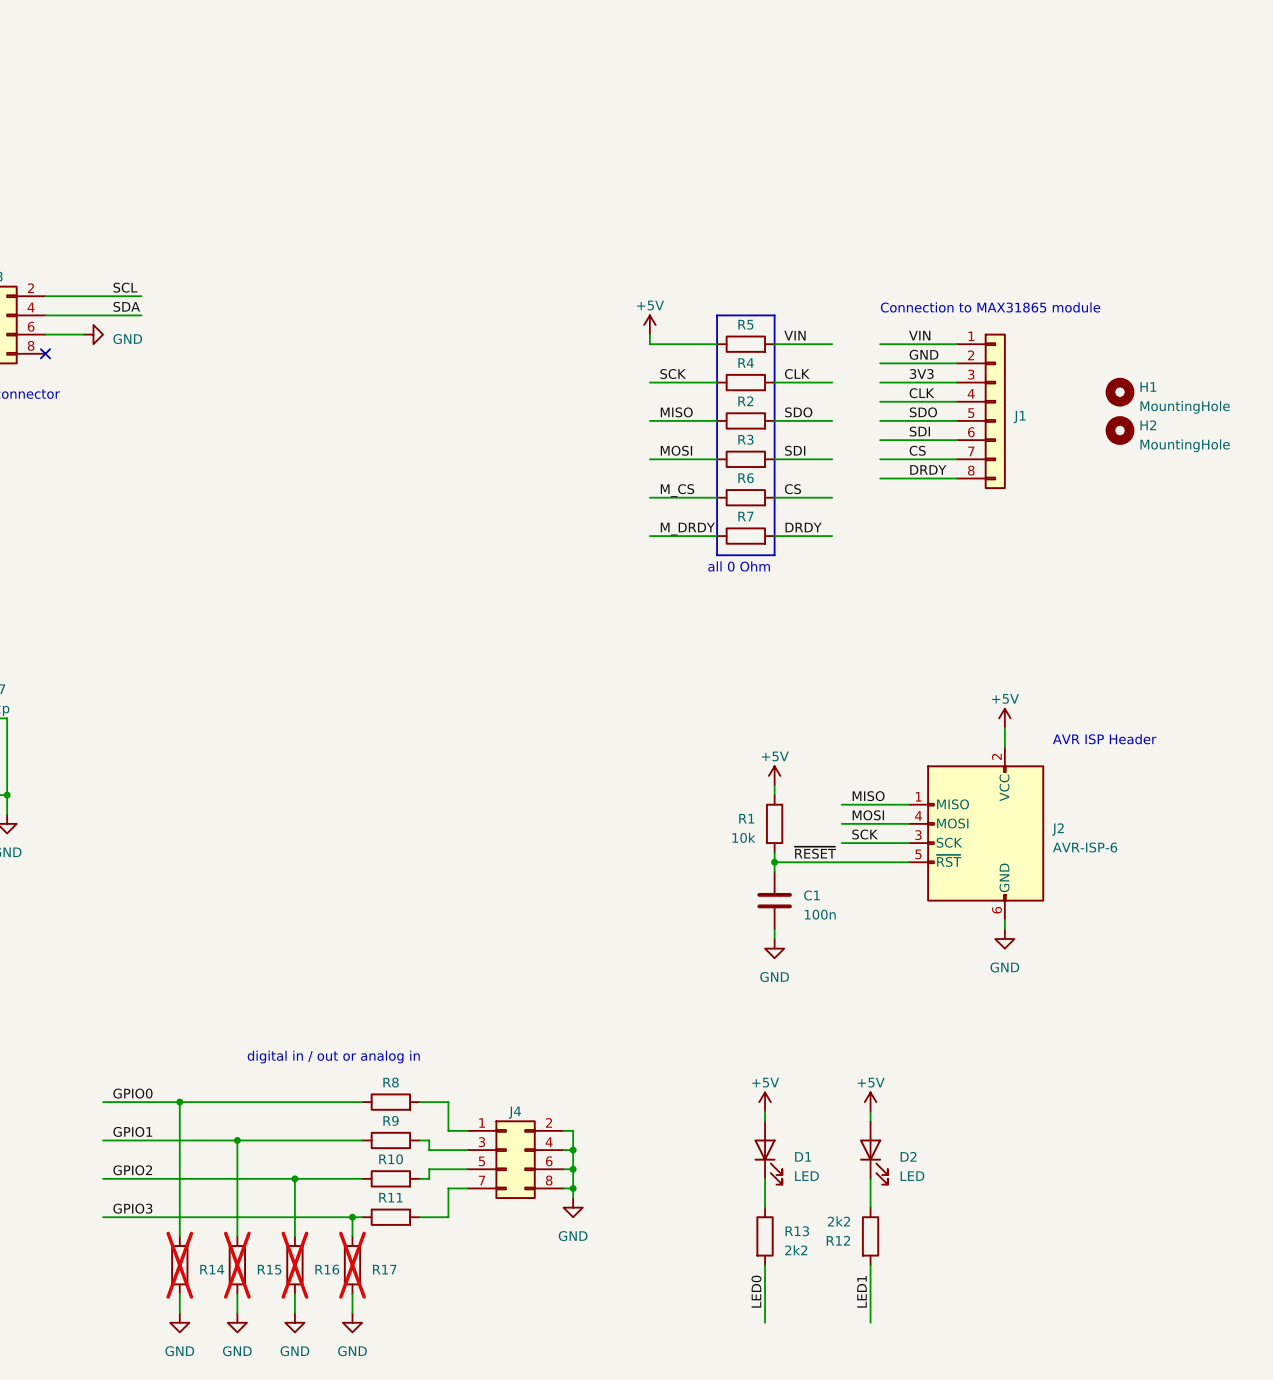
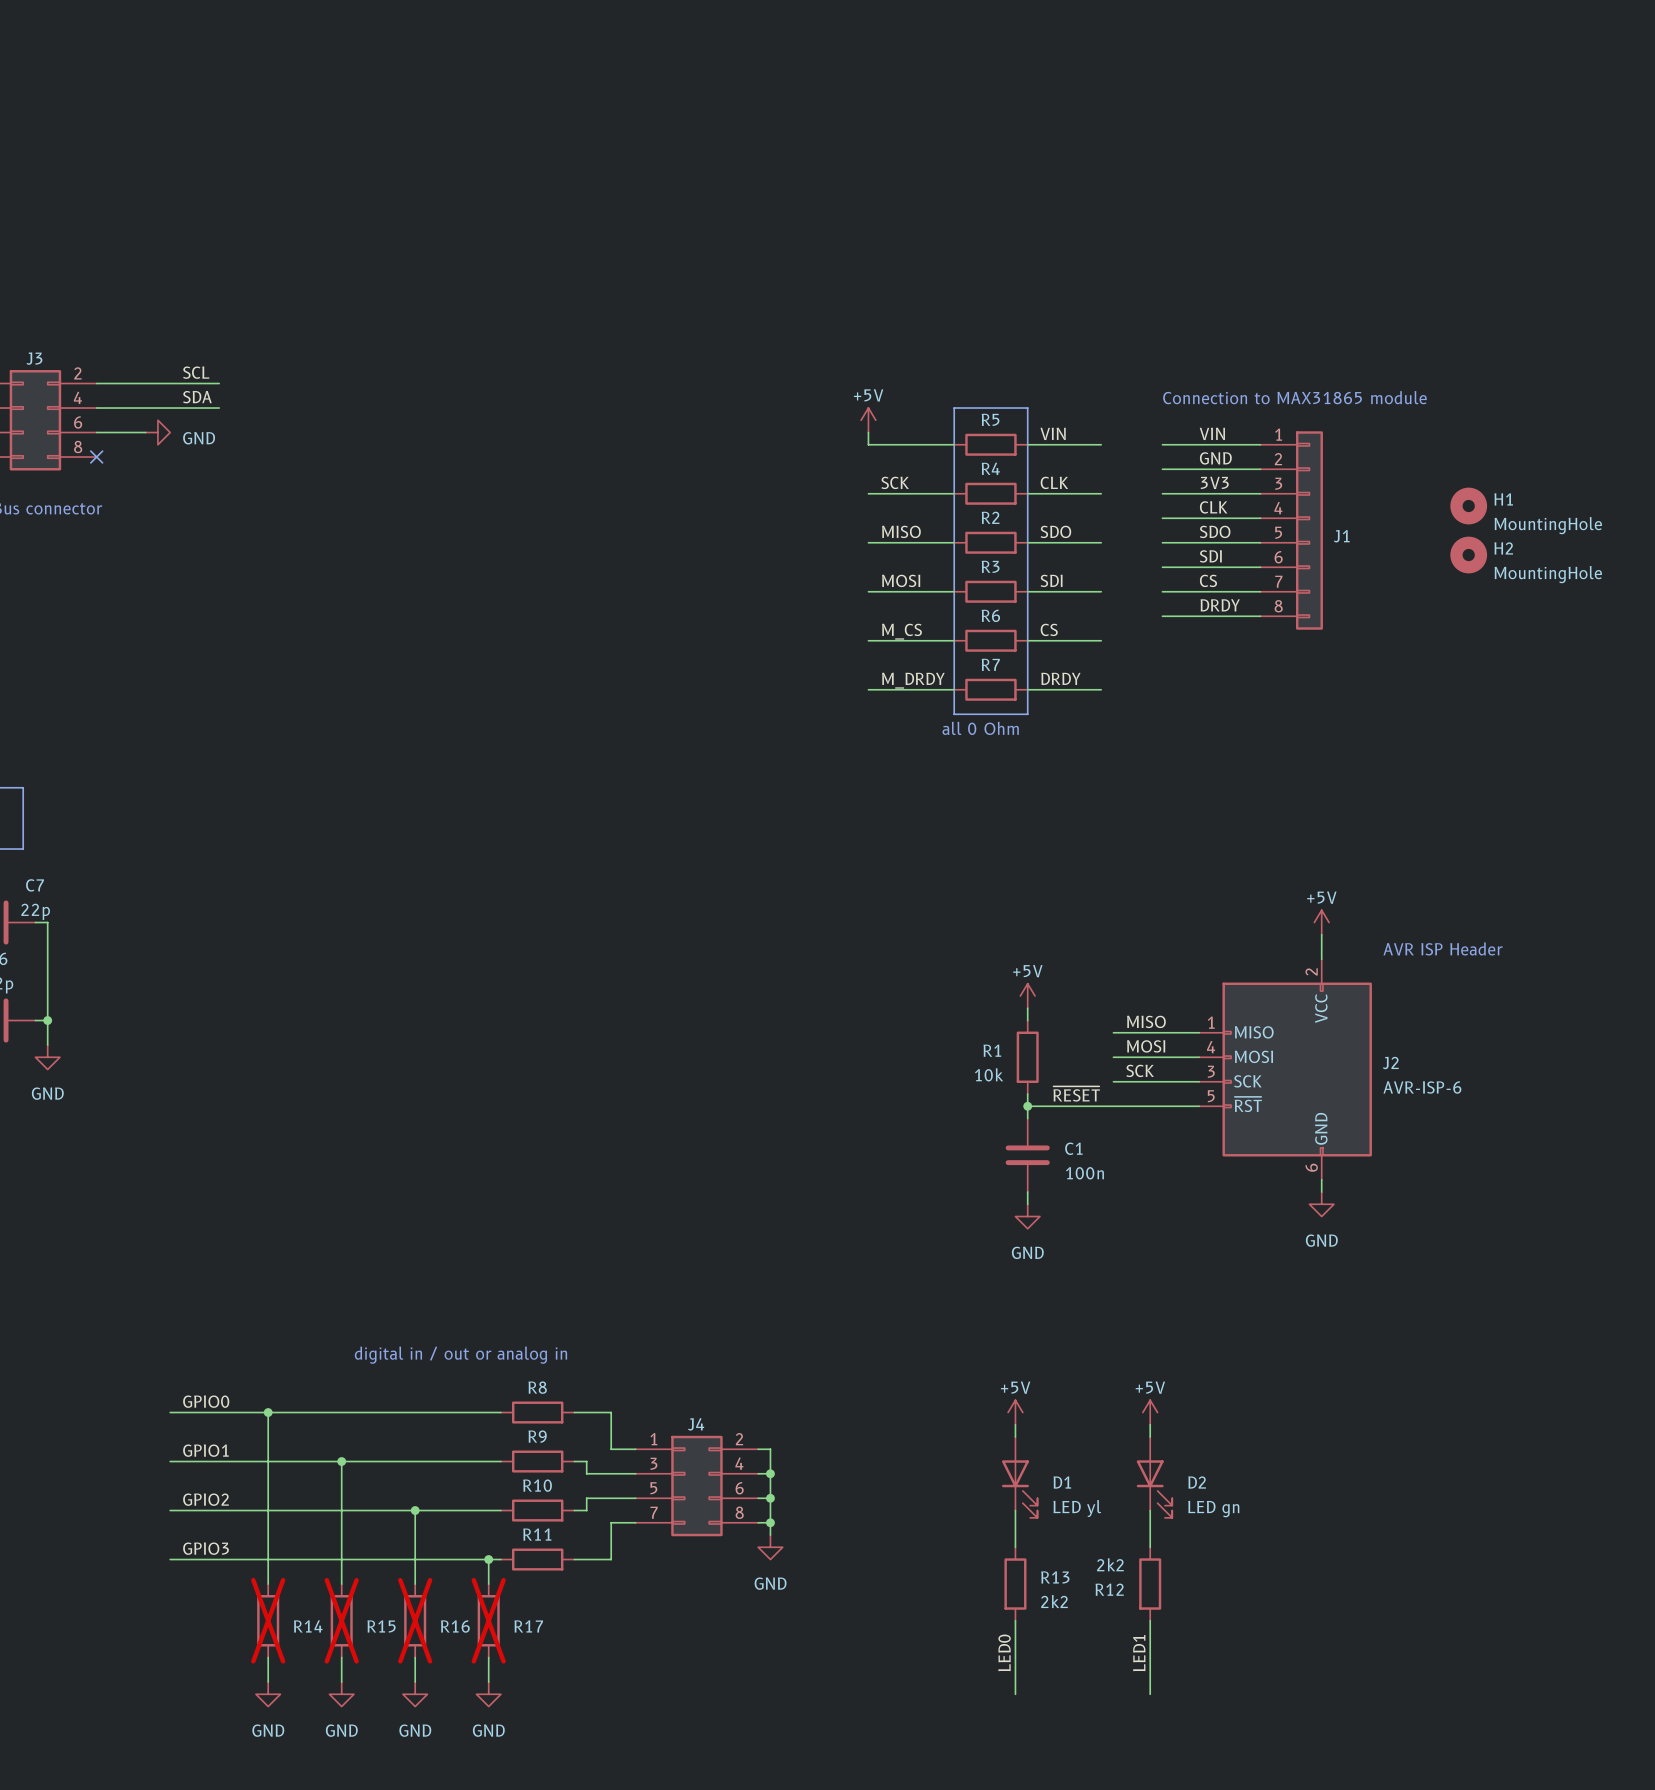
D1 value: LED (806, 1176) -> LED yl (1077, 1508)
D2 value: LED (912, 1176) -> LED gn (1213, 1509)

